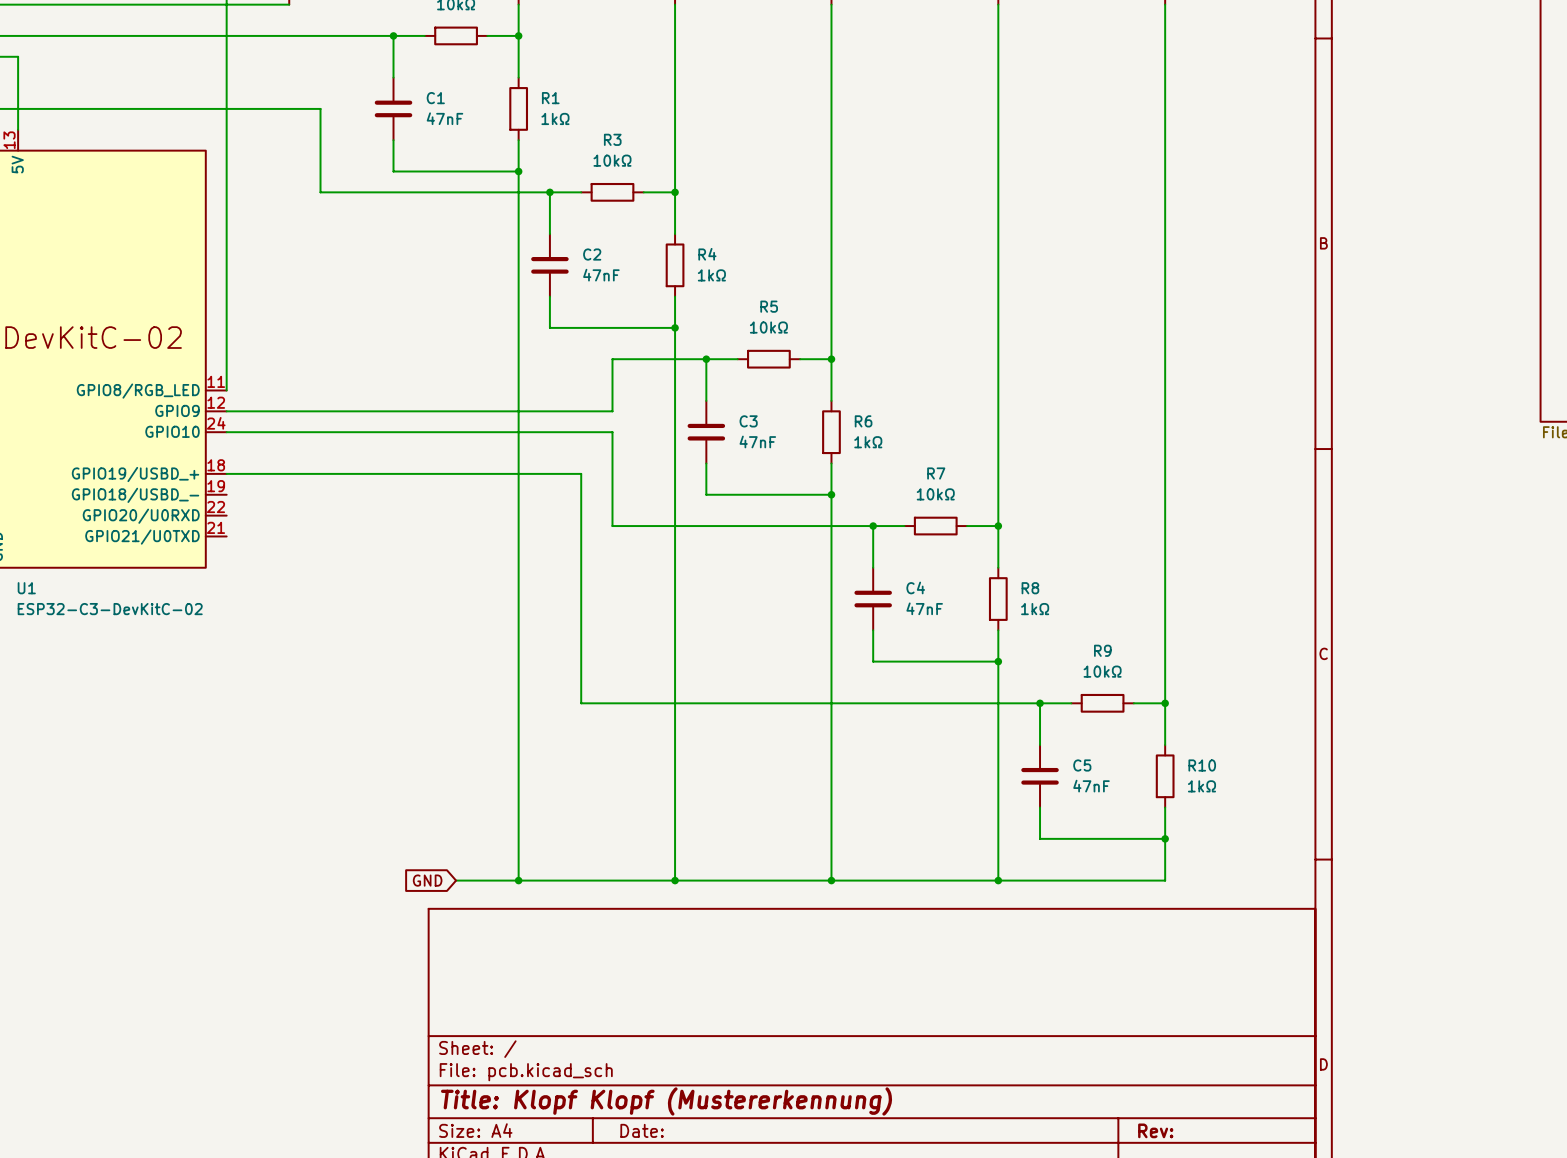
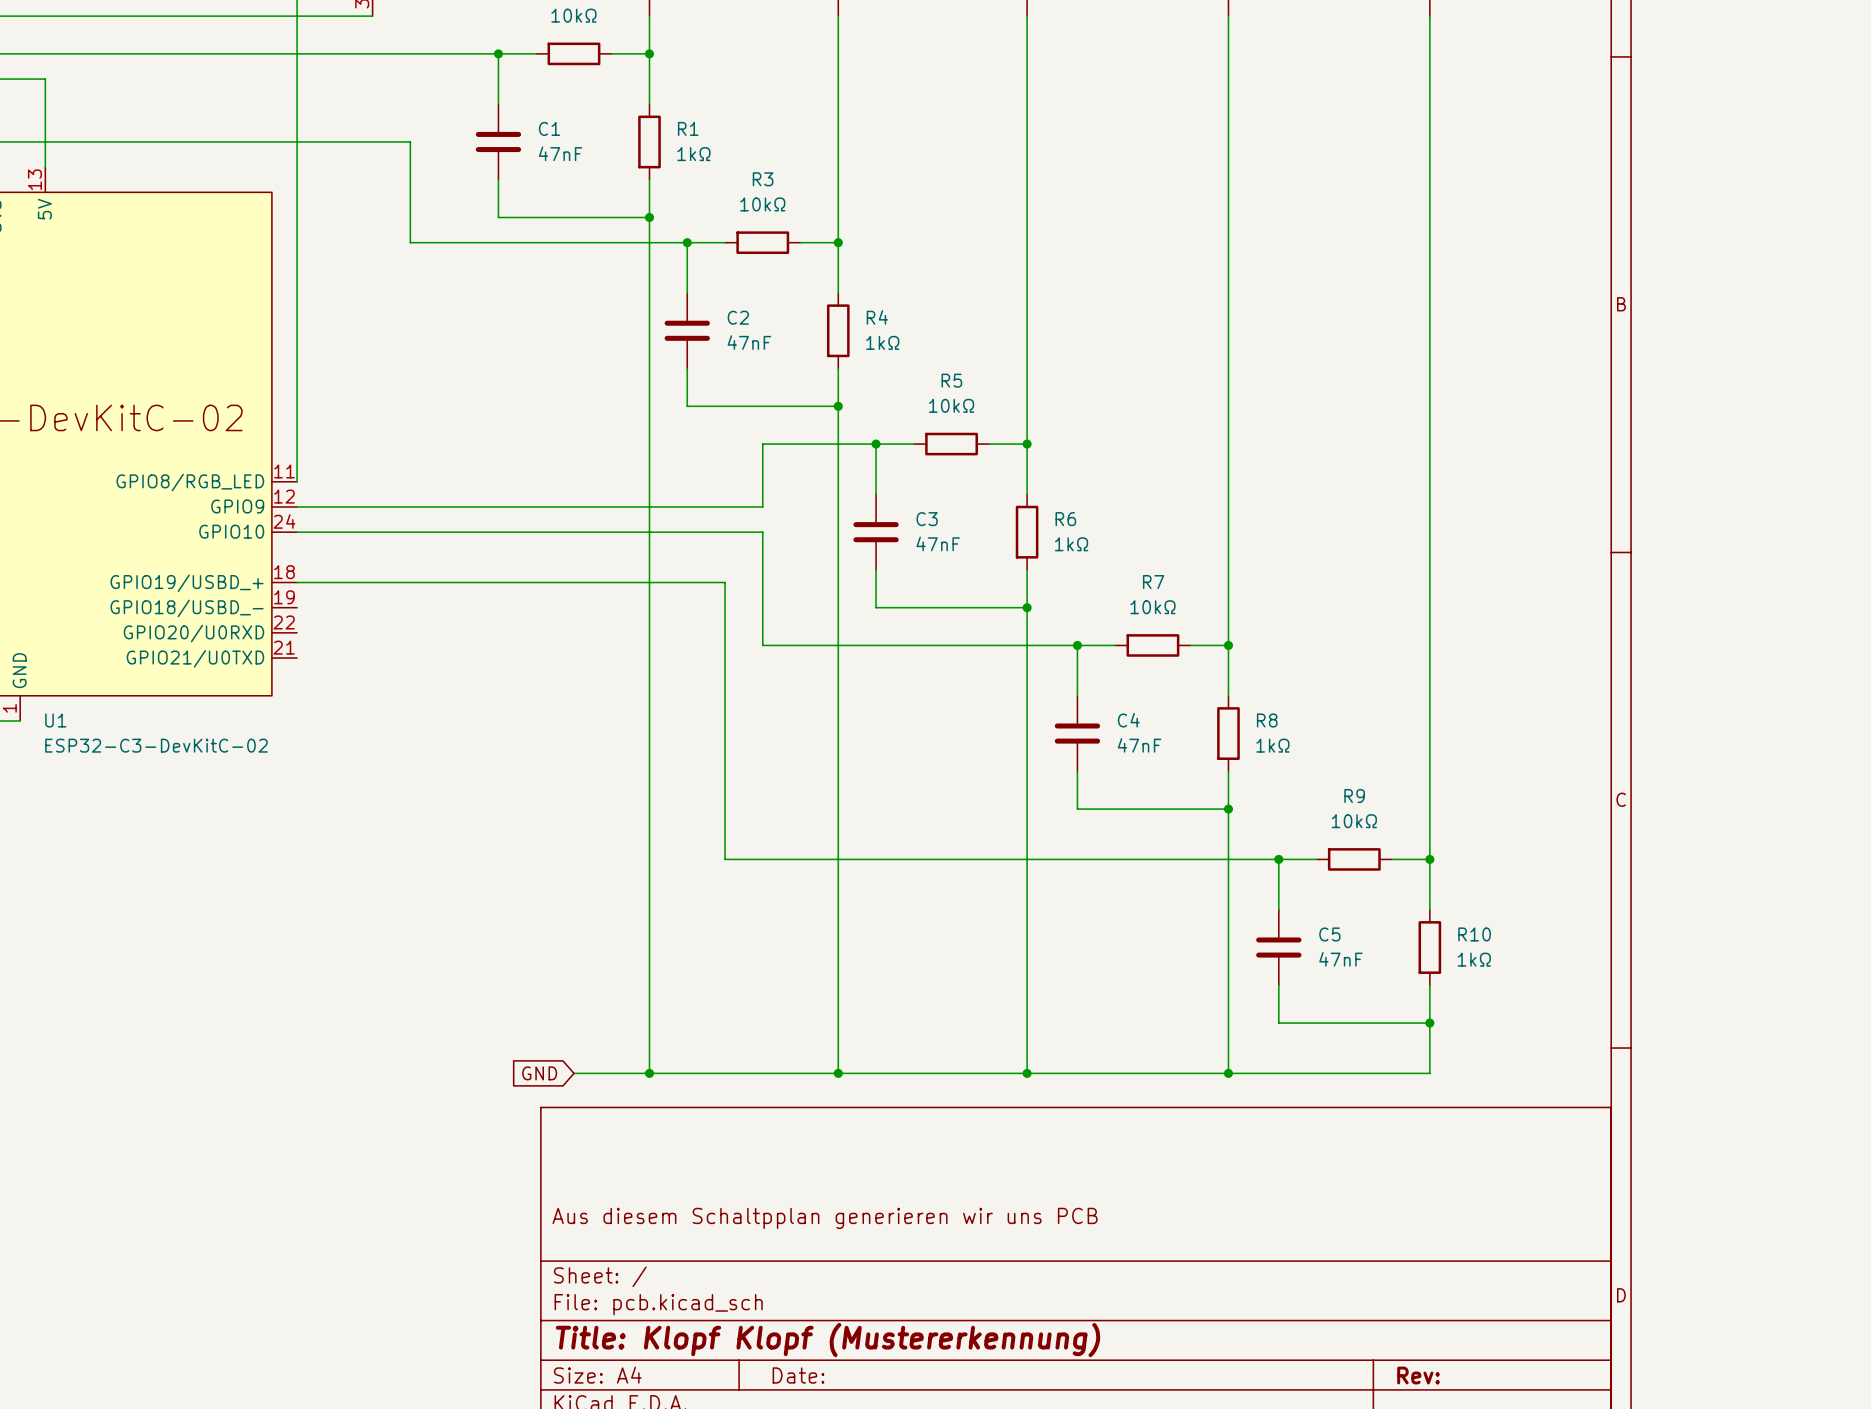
title block: none -> Aus diesem Schaltpplan generieren wir uns PCB (825, 1218)

